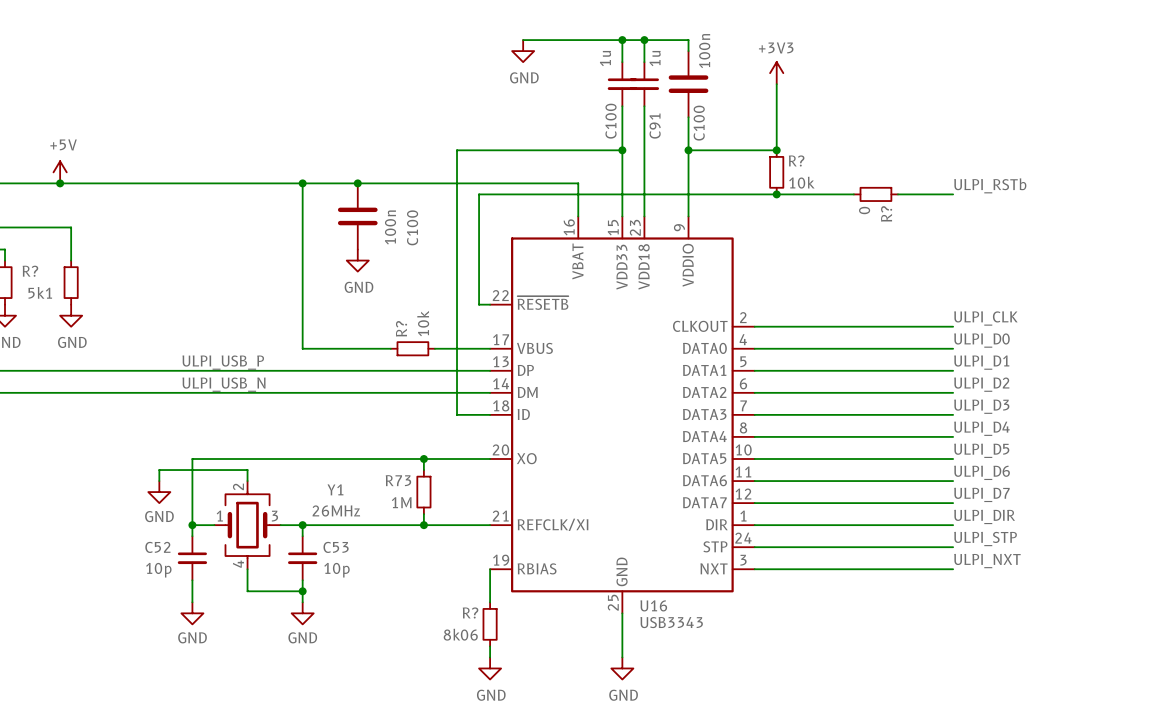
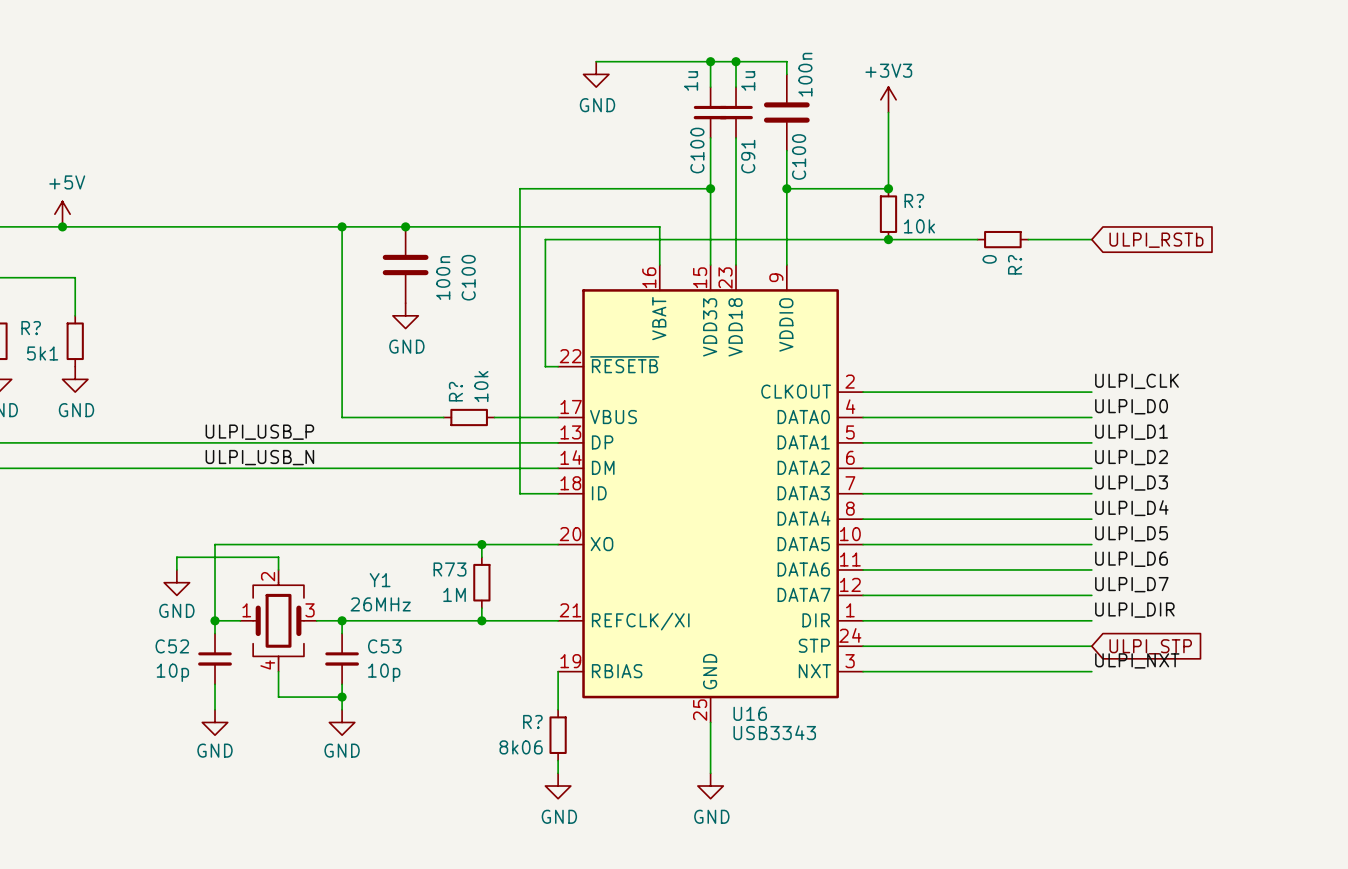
label: ULPI_RSTb (990, 185) -> none
global label: none -> ULPI_RSTb (1156, 240)
label: ULPI_STP (985, 539) -> none
global label: none -> ULPI_STP (1150, 646)

